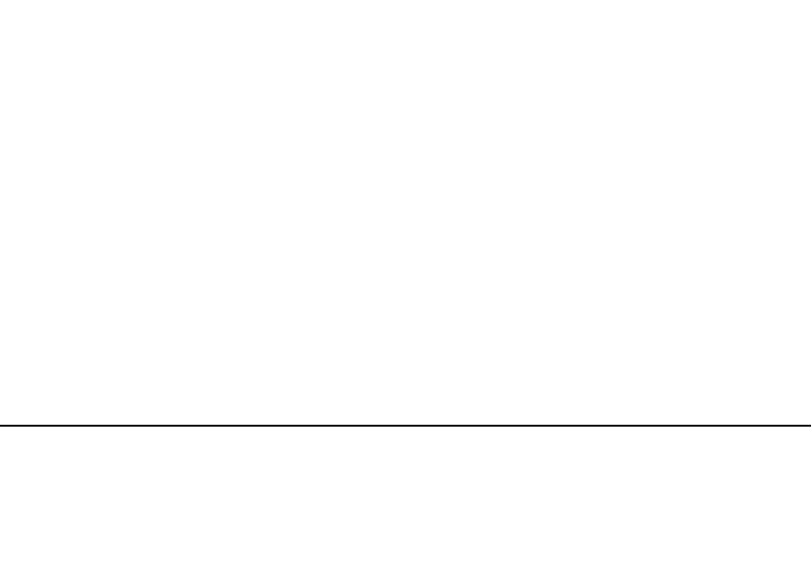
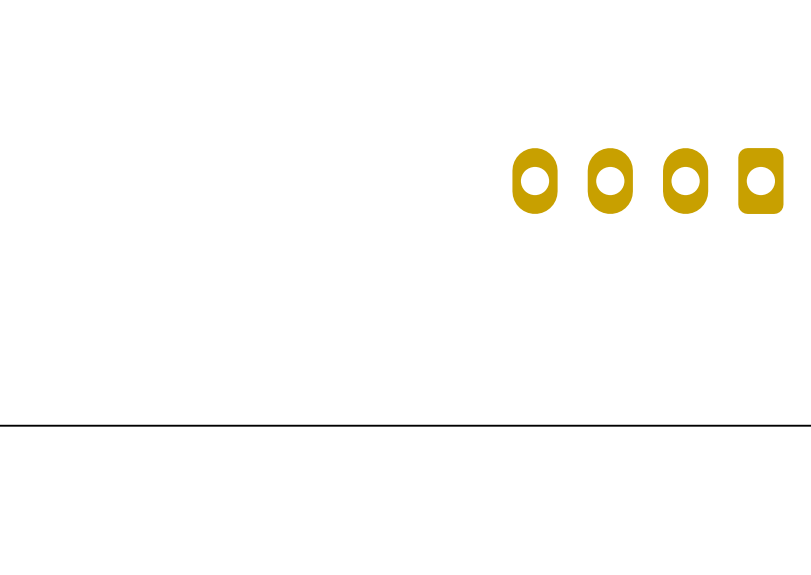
part: none -> (647, 181)

